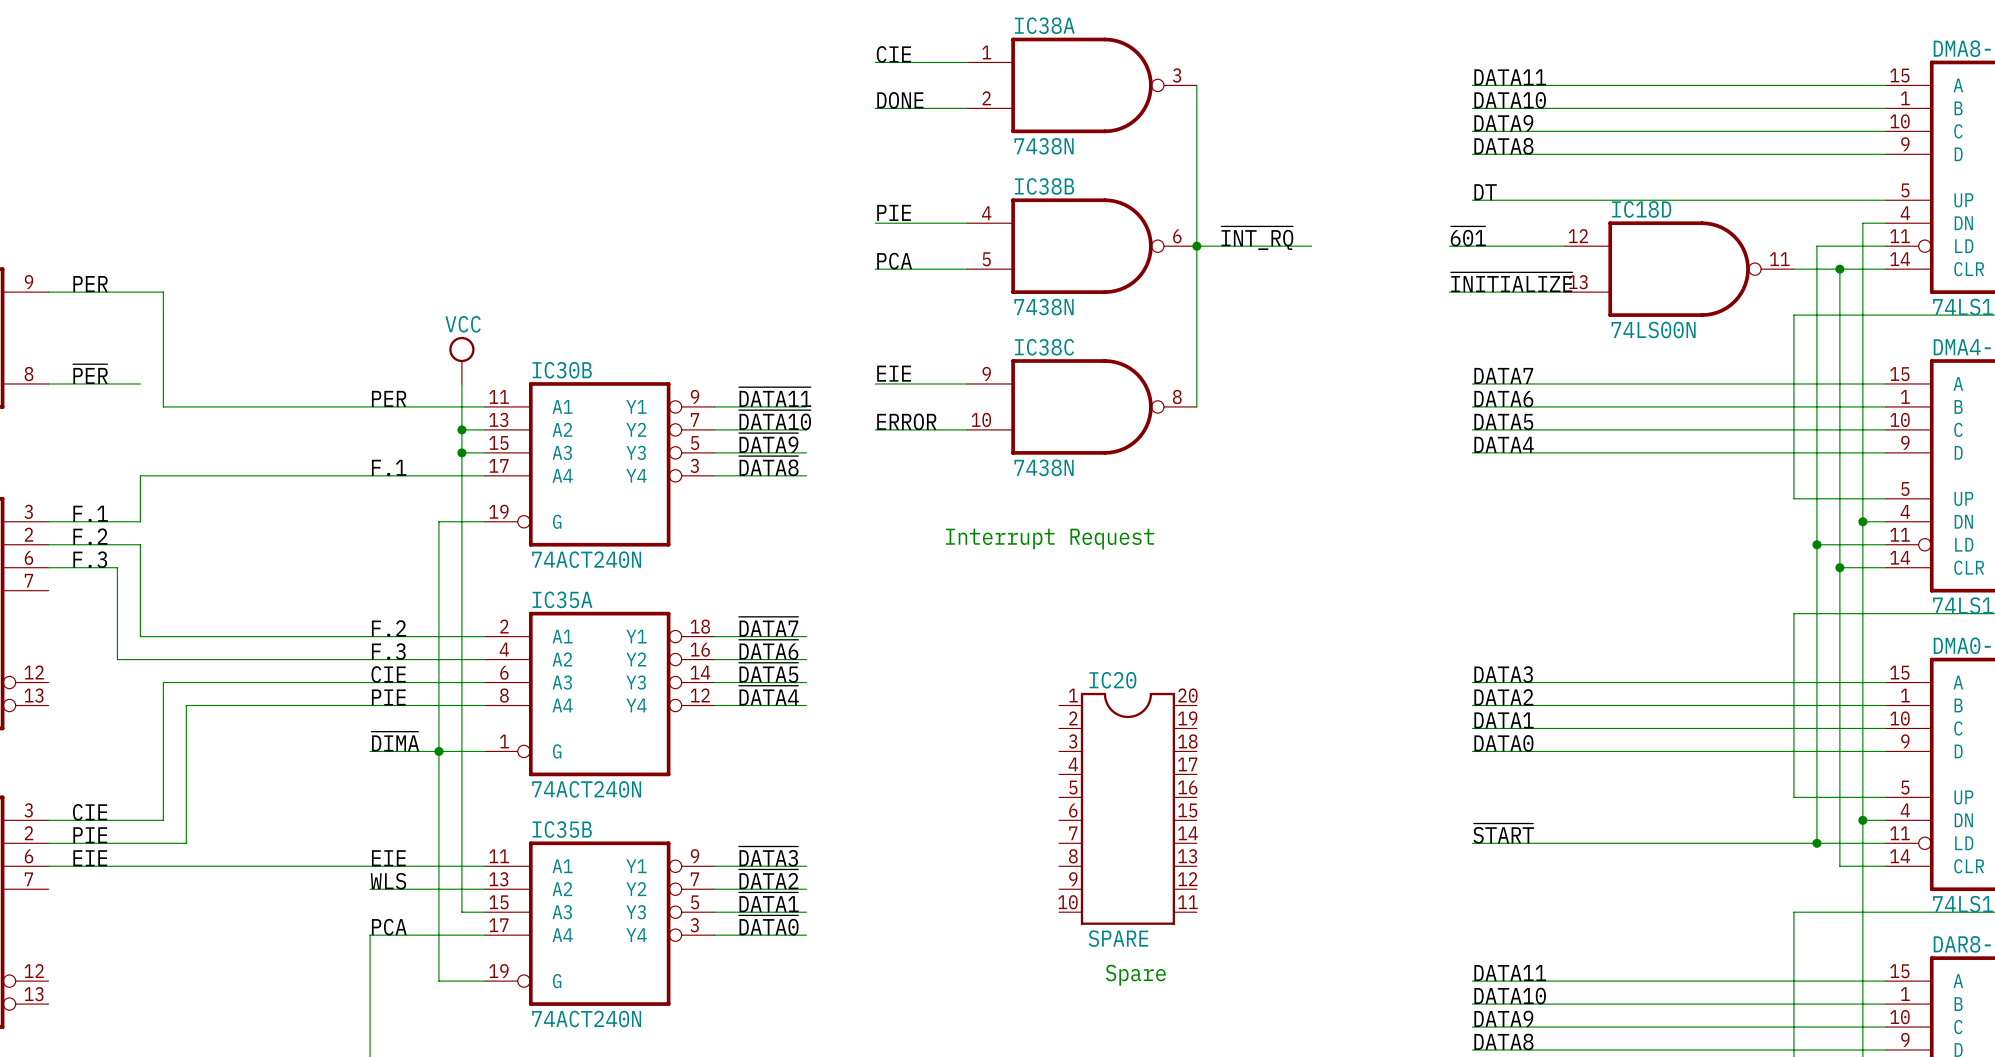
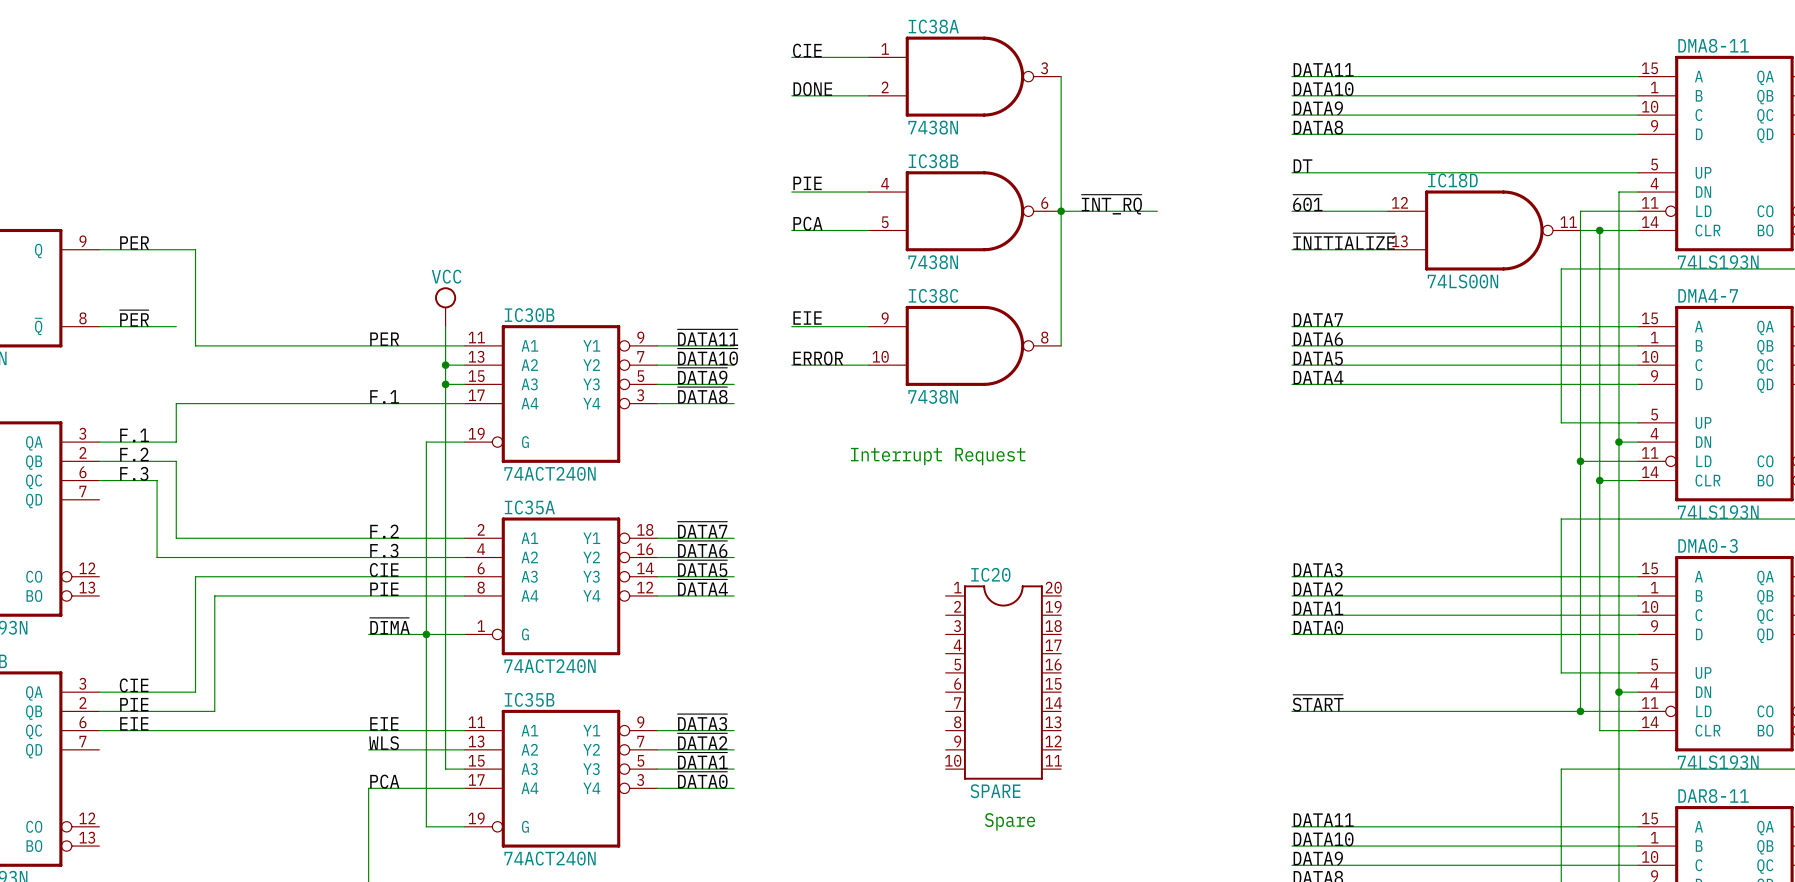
label position: ~{601} (1468, 236) -> ~{601} (1307, 203)
IC18D position: (1679, 269) -> (1484, 230)
label position: ~{INITIALIZE} (1511, 282) -> ~{INITIALIZE} (1344, 241)

